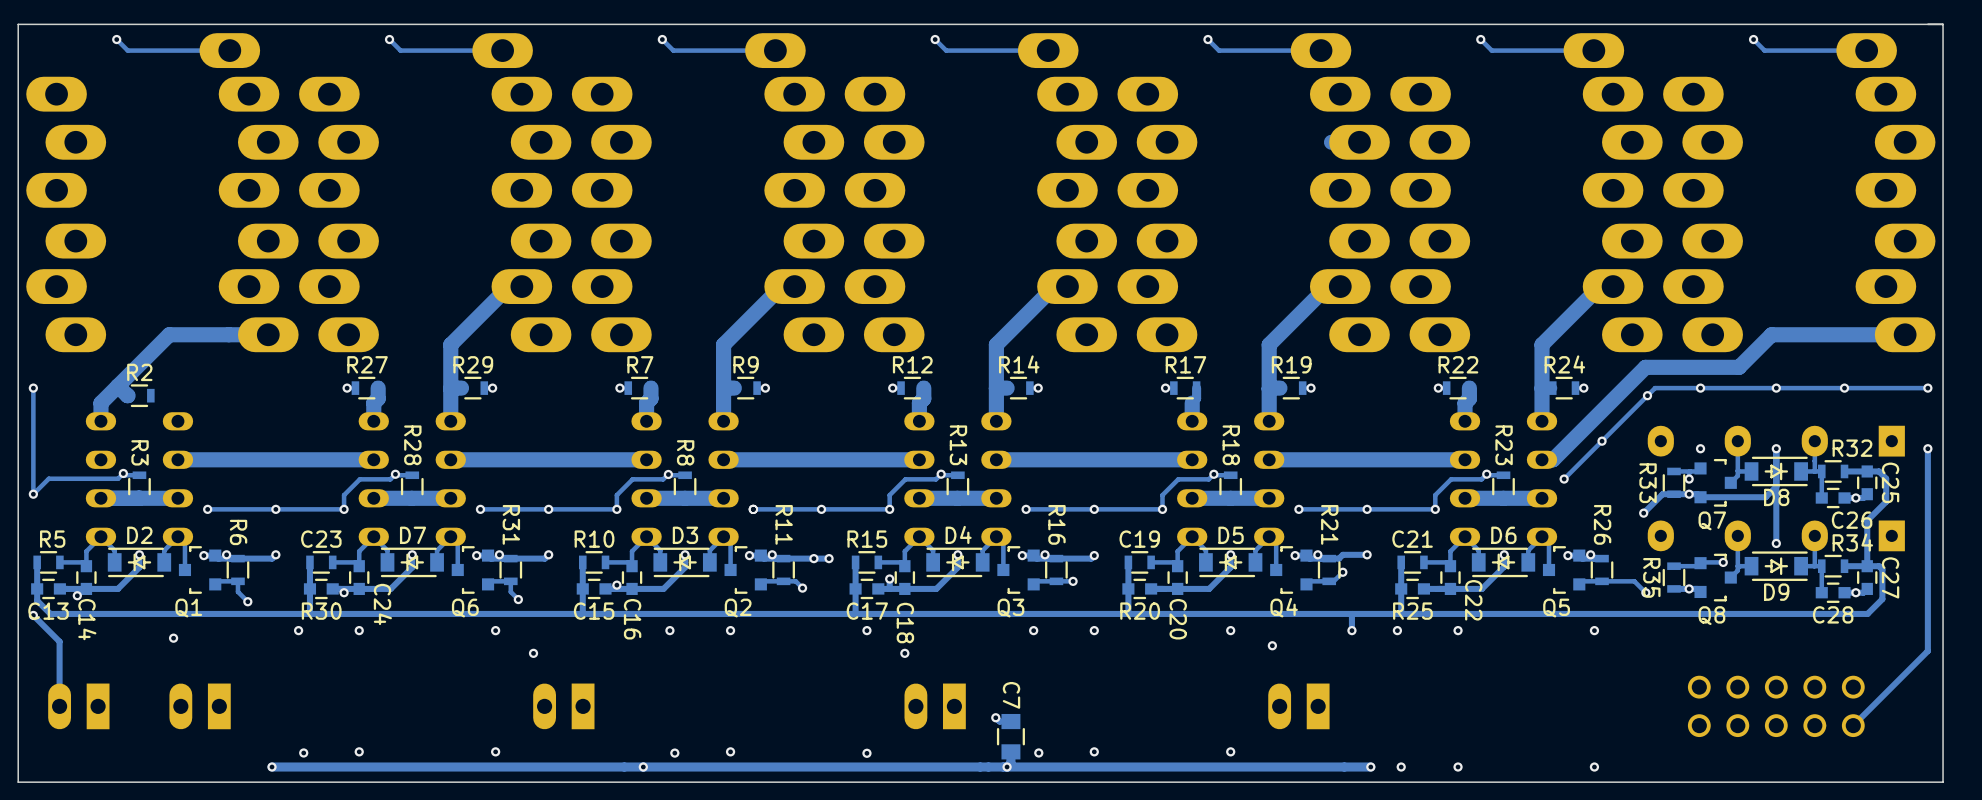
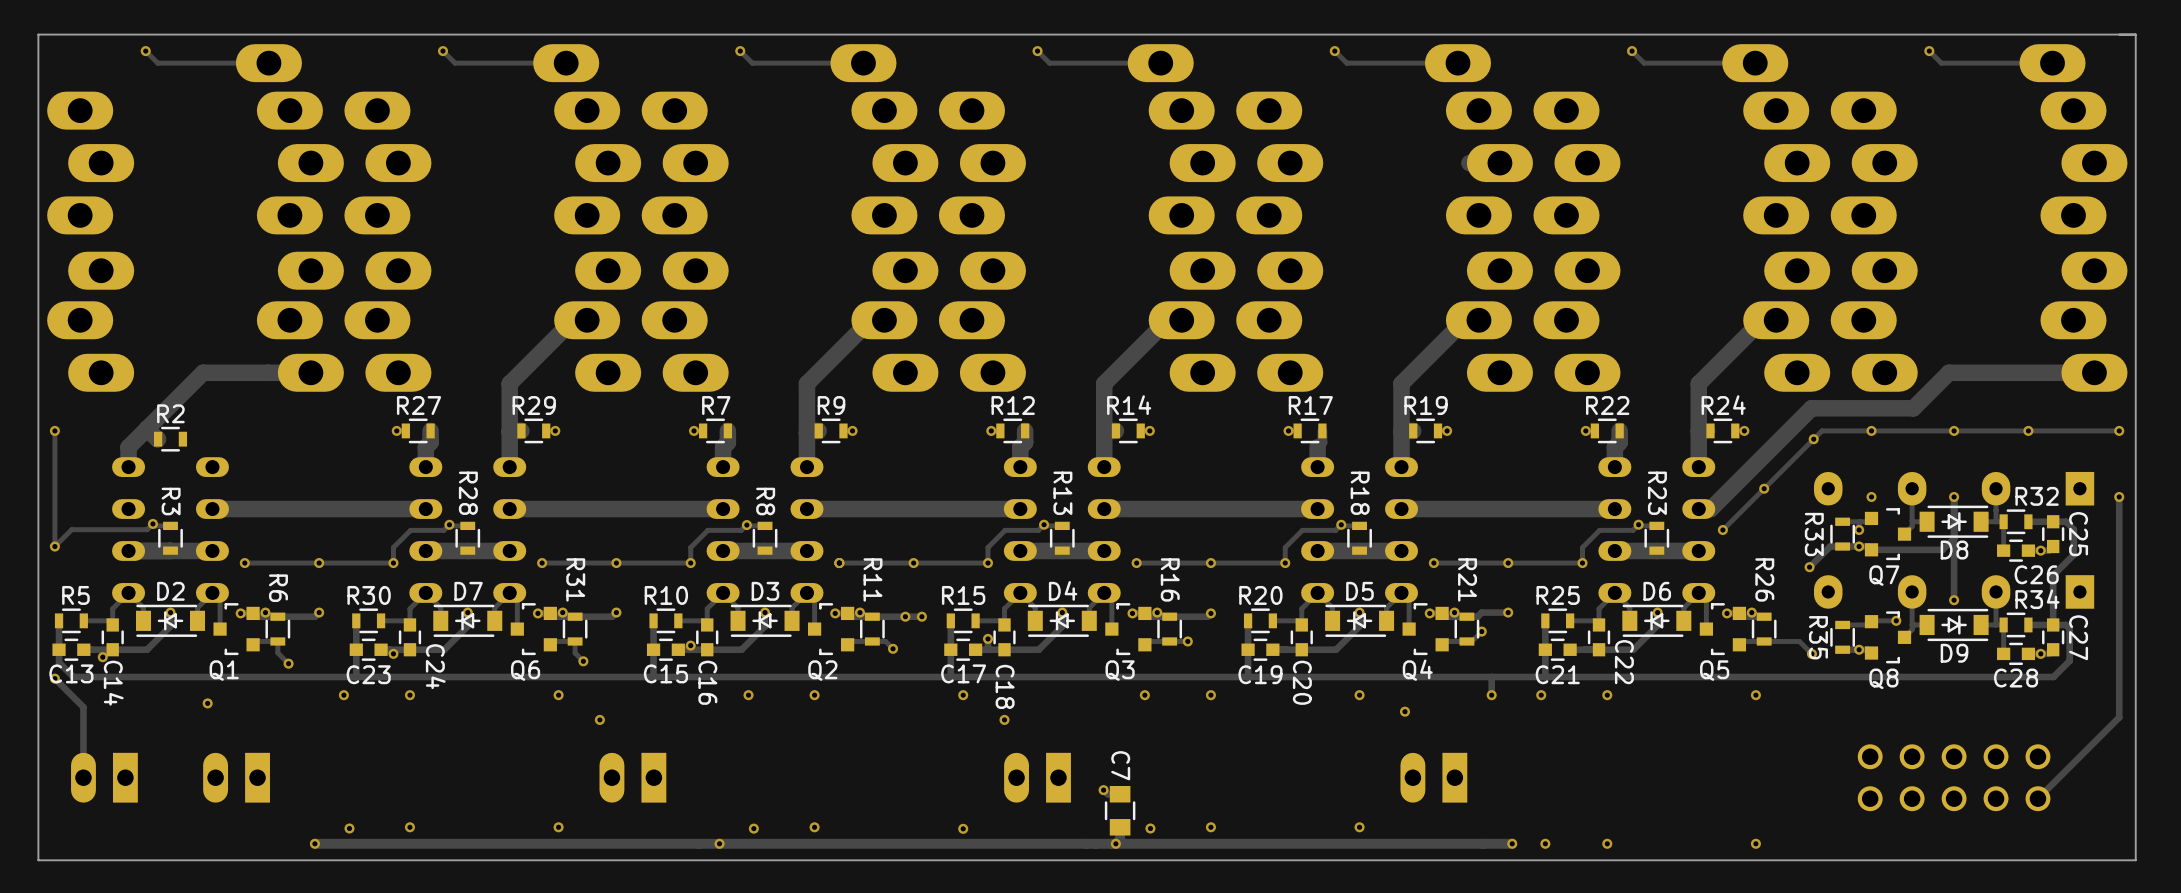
C23 name position: C23 (321, 539) -> C23 (368, 674)
C19 name position: C19 (1139, 539) -> C19 (1260, 674)
C21 name position: C21 (1412, 539) -> C21 (1557, 674)
R30 name position: R30 (321, 611) -> R30 (369, 595)
R20 name position: R20 (1140, 611) -> R20 (1260, 595)
R25 name position: R25 (1412, 611) -> R25 (1558, 595)

